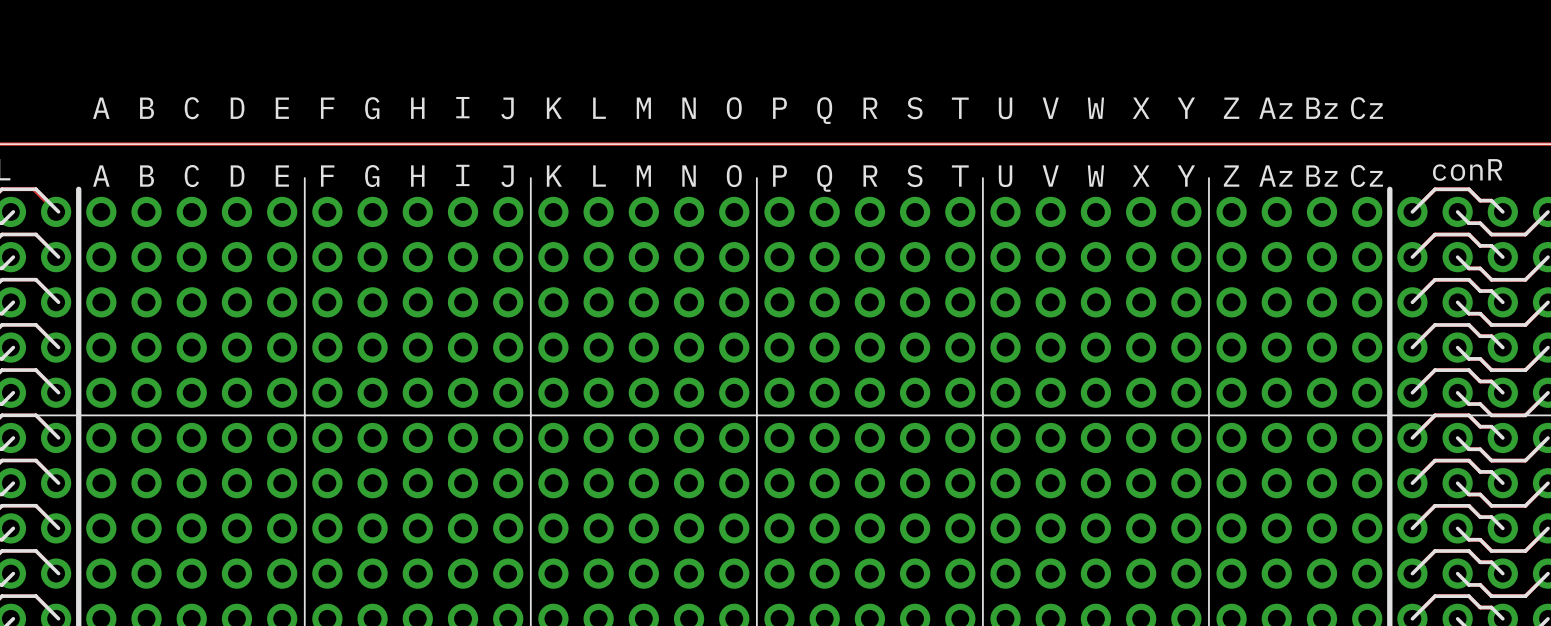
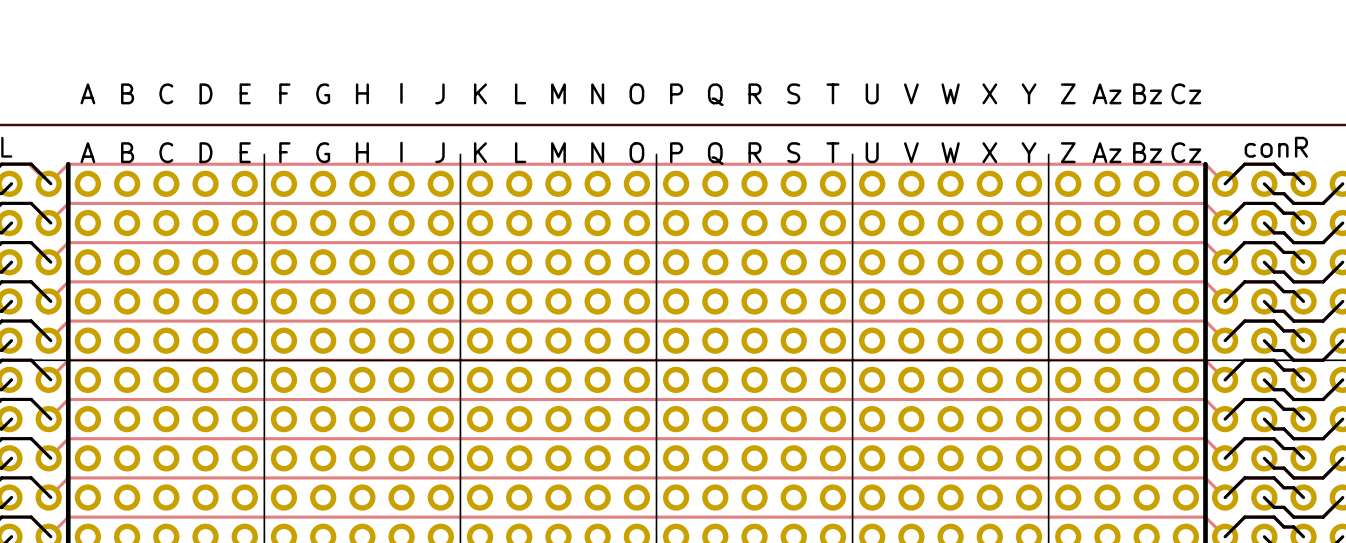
track: none -> (48, 183) (68, 164) (1205, 164) (1225, 183)
track: none -> (48, 223) (68, 203) (1205, 203) (1225, 223)
track: none -> (48, 262) (68, 242) (1205, 242) (1225, 262)
track: none -> (48, 301) (68, 281) (1205, 281) (1225, 301)
track: none -> (48, 340) (68, 321) (1205, 321) (1225, 340)
track: none -> (48, 379) (68, 360) (1205, 360) (1225, 379)
track: none -> (48, 419) (68, 399) (1205, 399) (1225, 419)
track: none -> (48, 458) (68, 438) (1205, 438) (1225, 458)
track: none -> (48, 497) (68, 477) (1205, 477) (1225, 497)
track: none -> (48, 536) (68, 517) (1205, 517) (1225, 536)

